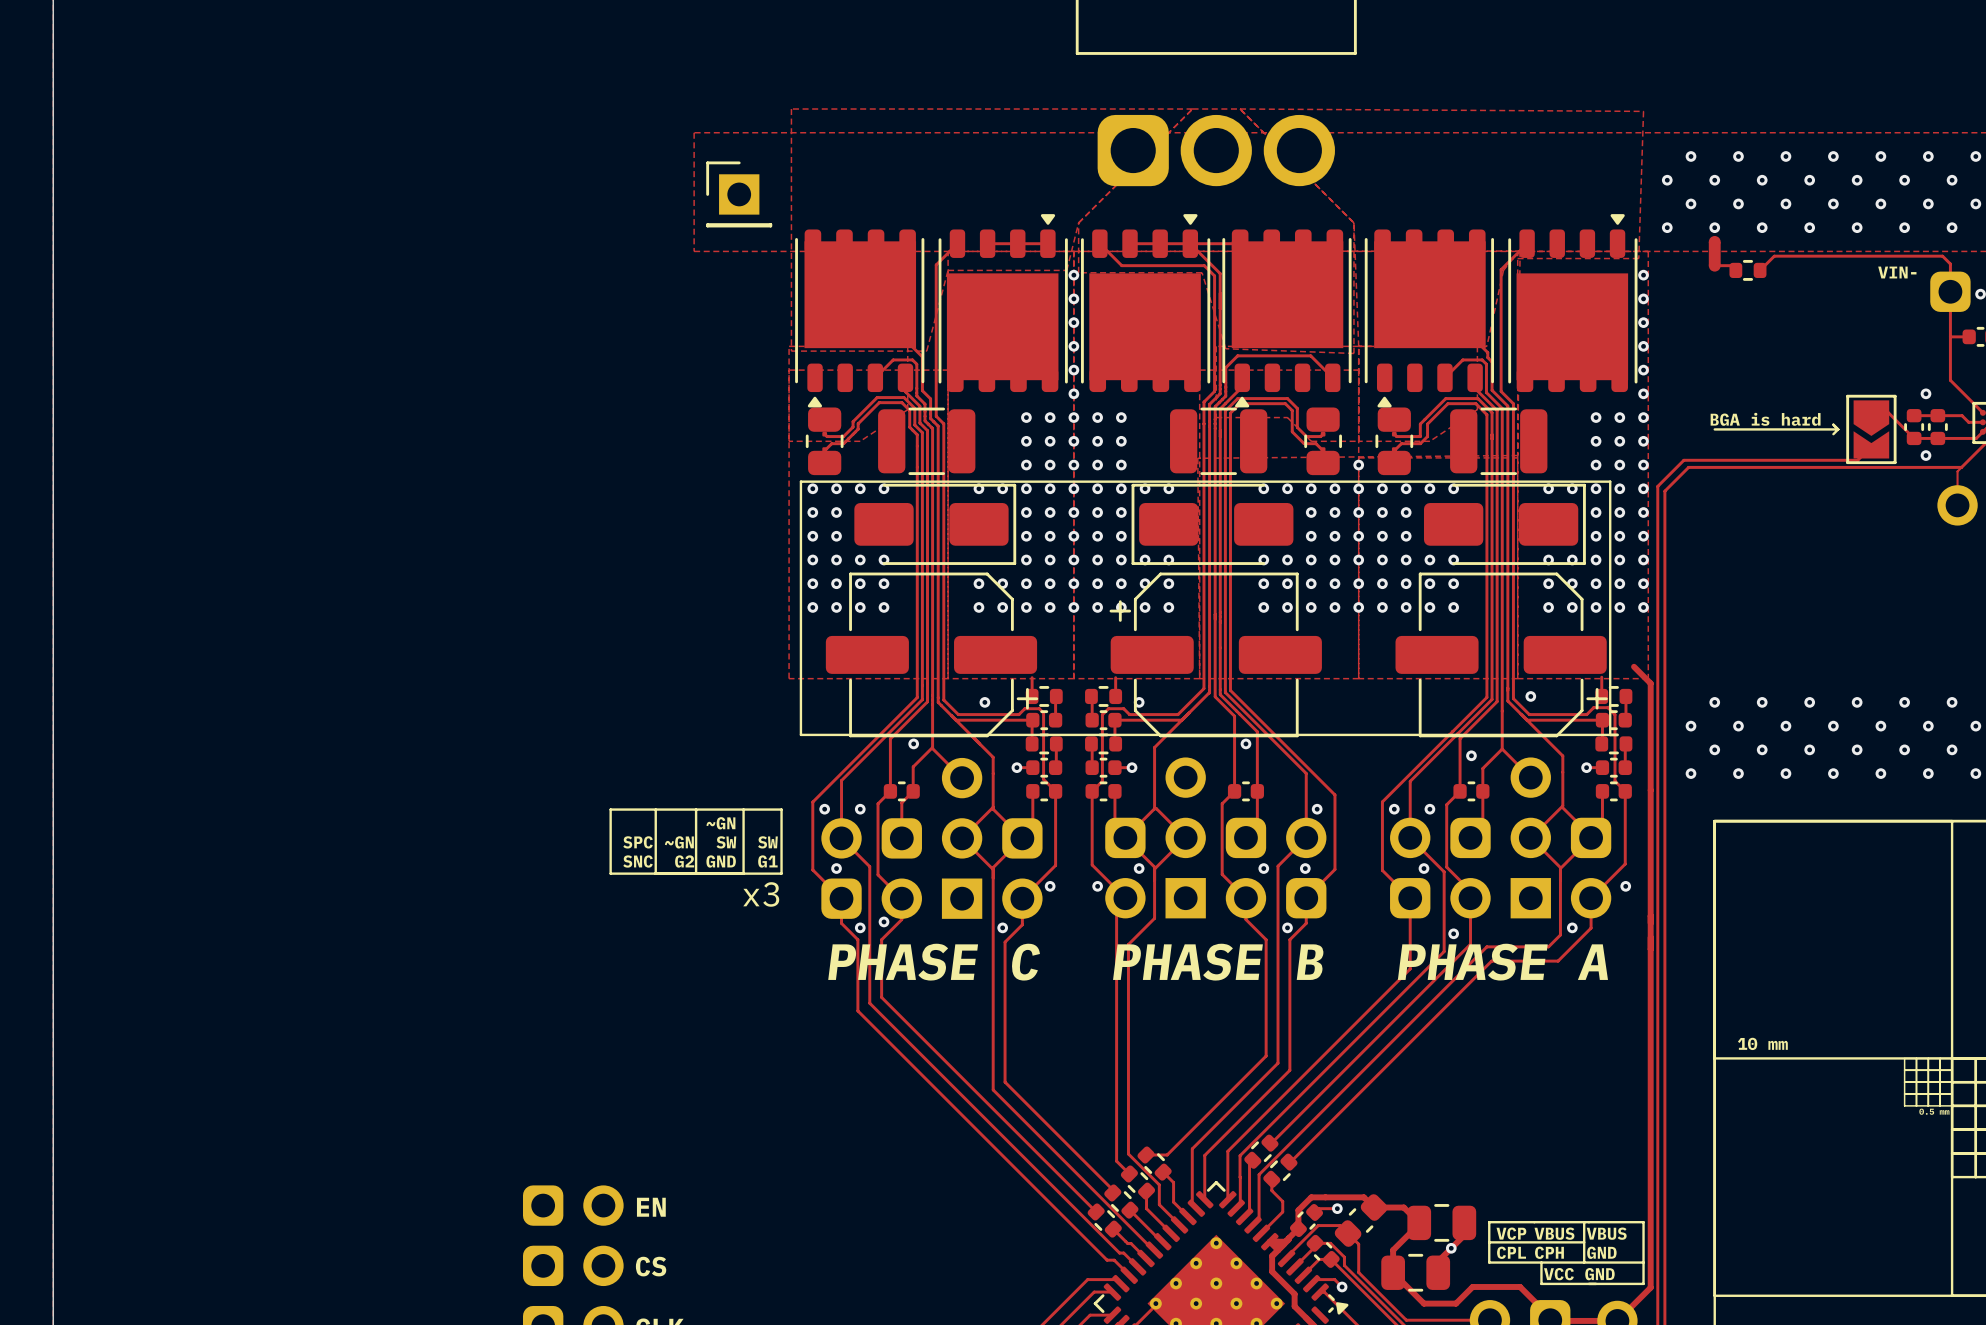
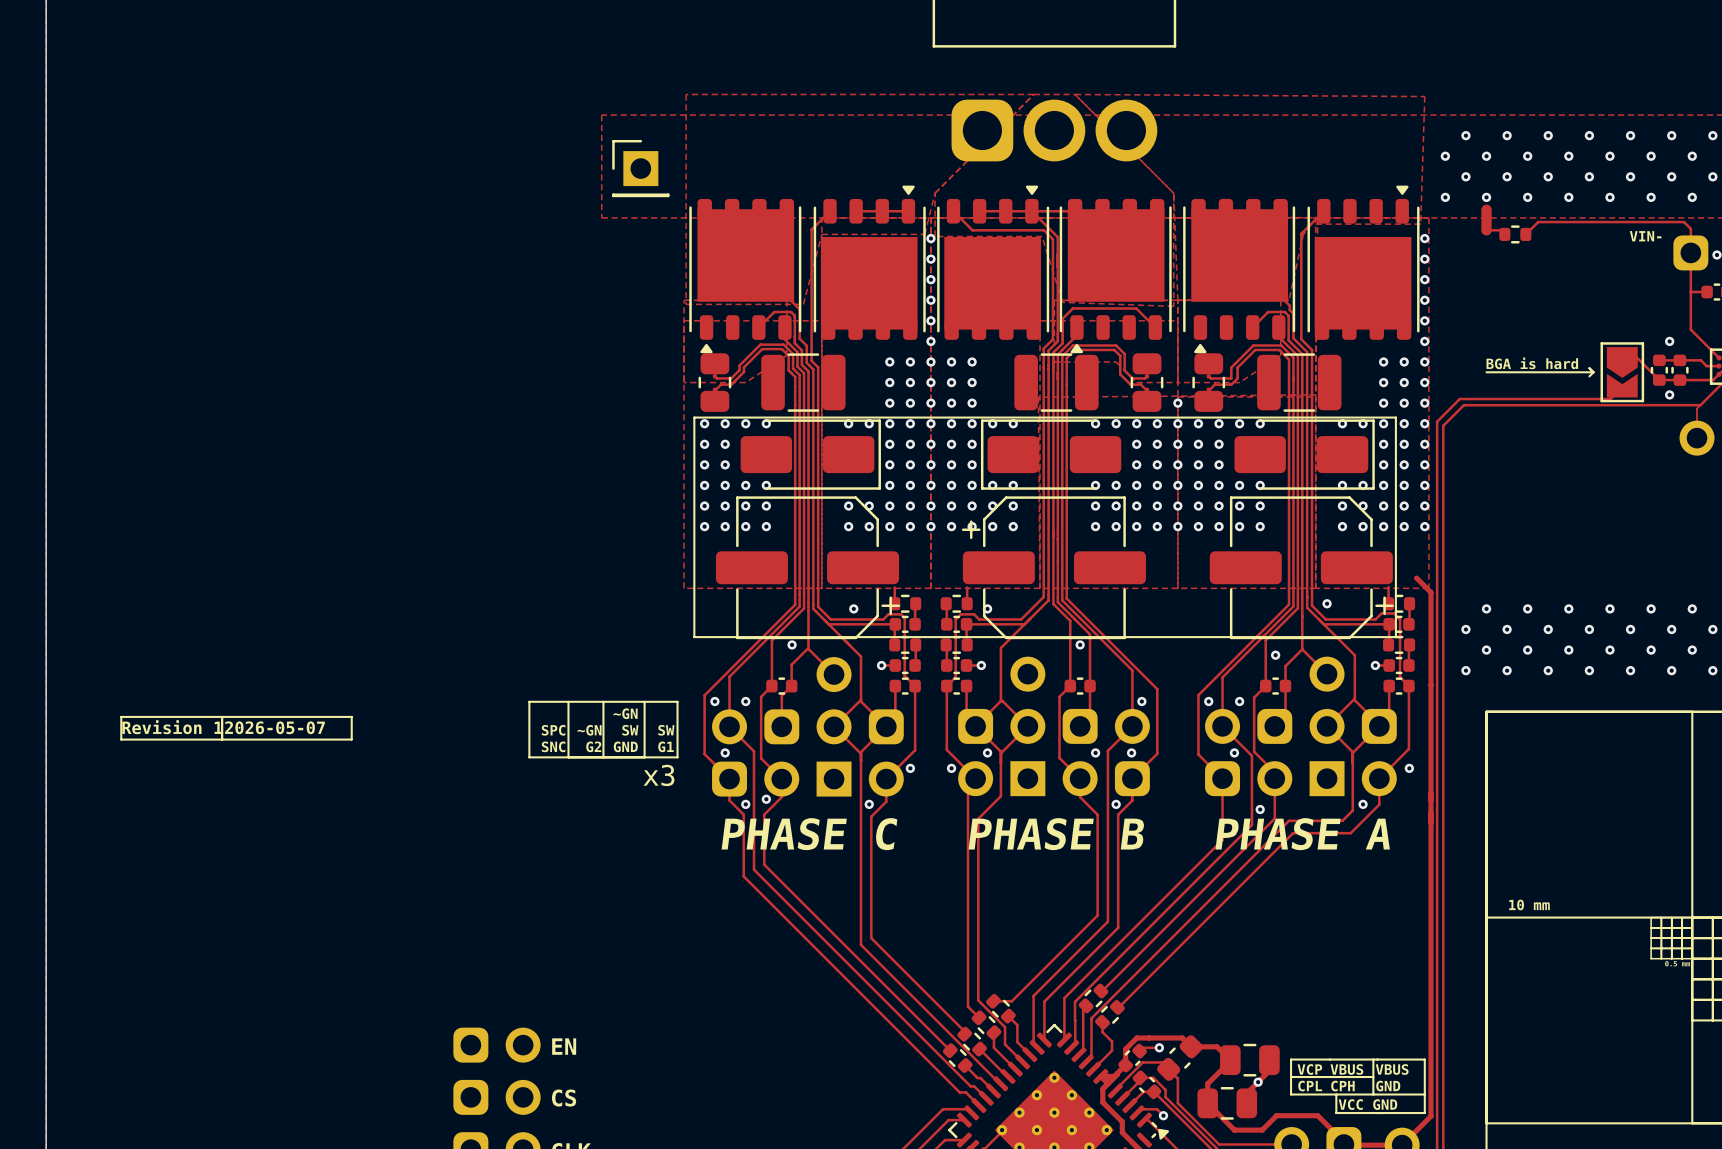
line: none -> (121, 716) (351, 716) (351, 739) (121, 739) (121, 716)
text: none -> Revision 1 (172, 727)
text: none -> 2026-05-07 (274, 727)

